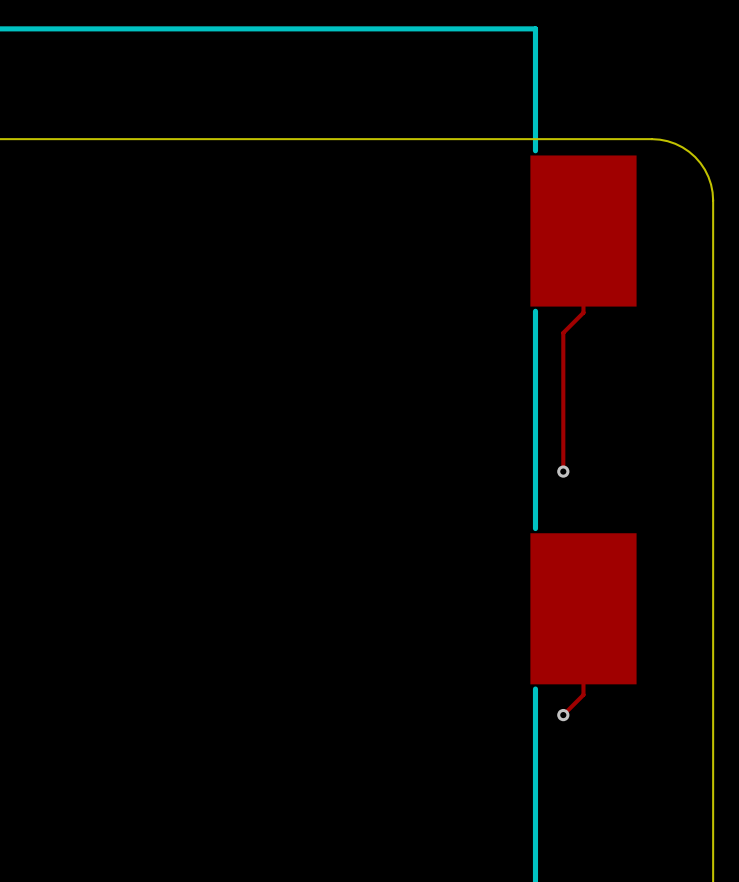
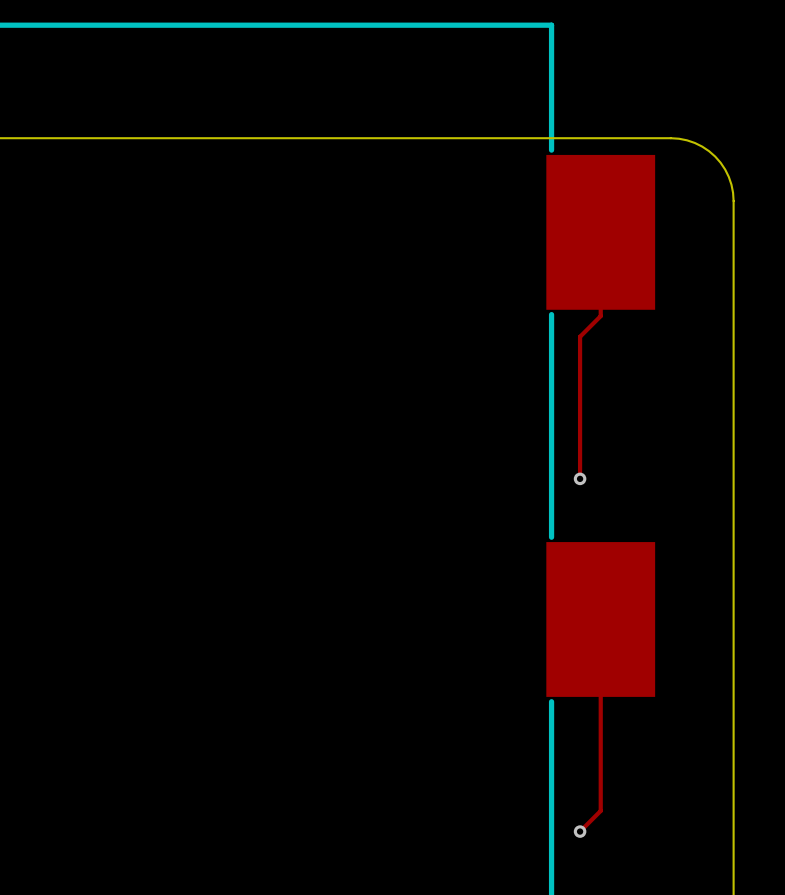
top track: (583, 694) (563, 715) -> (600, 707) (600, 810) (580, 831)
via position: (563, 715) -> (580, 831)

